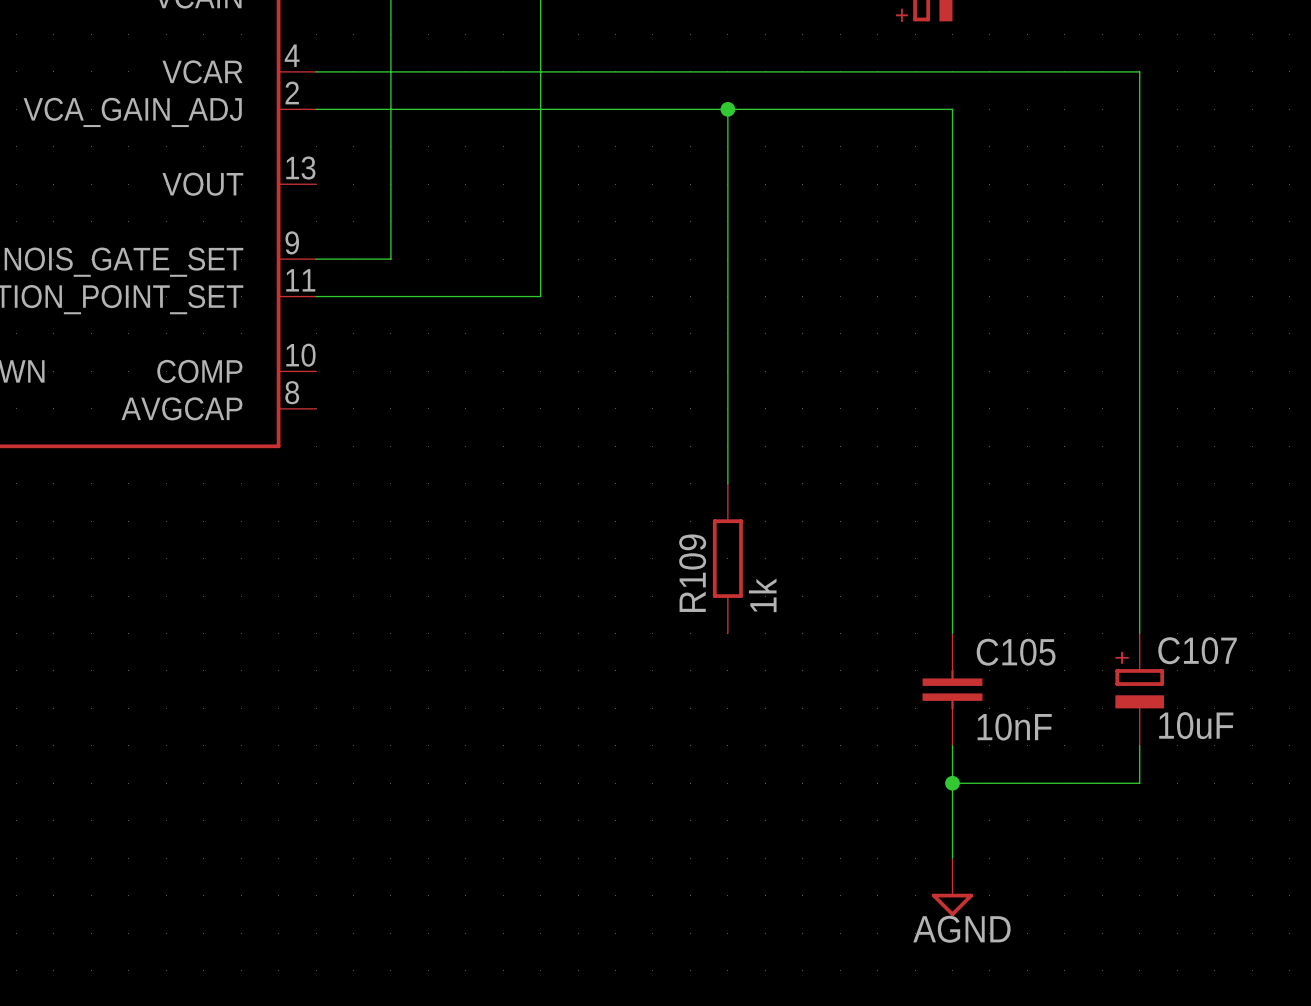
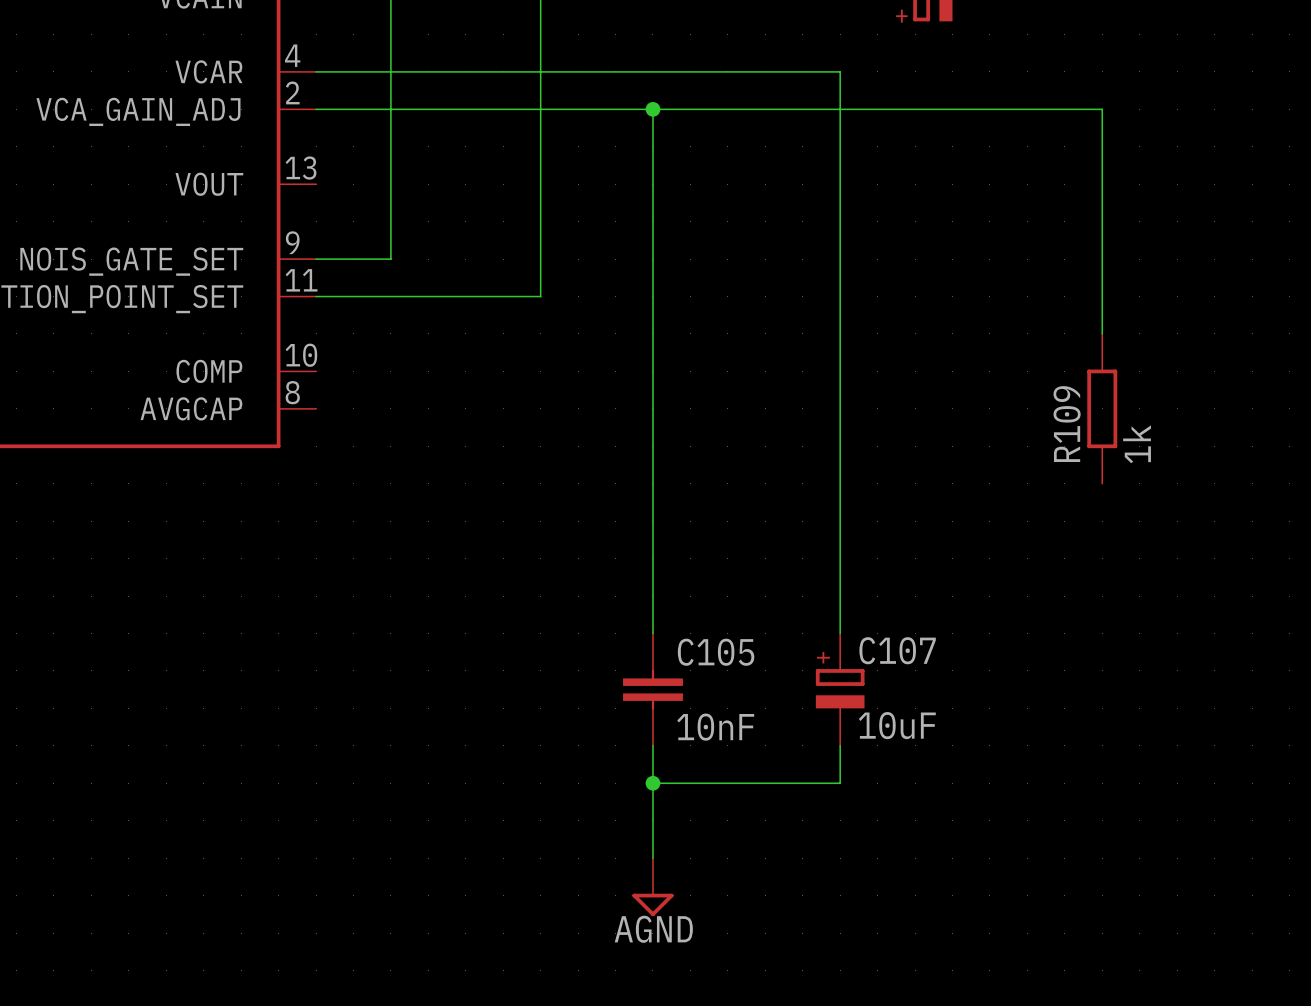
wire: (840, 71) (1139, 71) (1139, 633) -> (840, 71) (840, 633)
wire: none -> (652, 109) (652, 633)
wire: (727, 109) (727, 483) -> none
junction position: (727, 109) -> (652, 109)
wire: (952, 109) (952, 633) -> (952, 109) (1102, 109) (1102, 333)
R109 position: (727, 558) -> (1102, 408)
C105 position: (952, 689) -> (652, 689)
C107 position: (1139, 689) -> (840, 689)
wire: (952, 745) (952, 858) -> (652, 745) (652, 858)
wire: (1139, 745) (1139, 783) (952, 783) -> (840, 745) (840, 783) (652, 783)
junction: none -> (652, 783)
junction: (952, 783) -> none
power symbol position: AGND (952, 887) -> AGND (652, 887)

